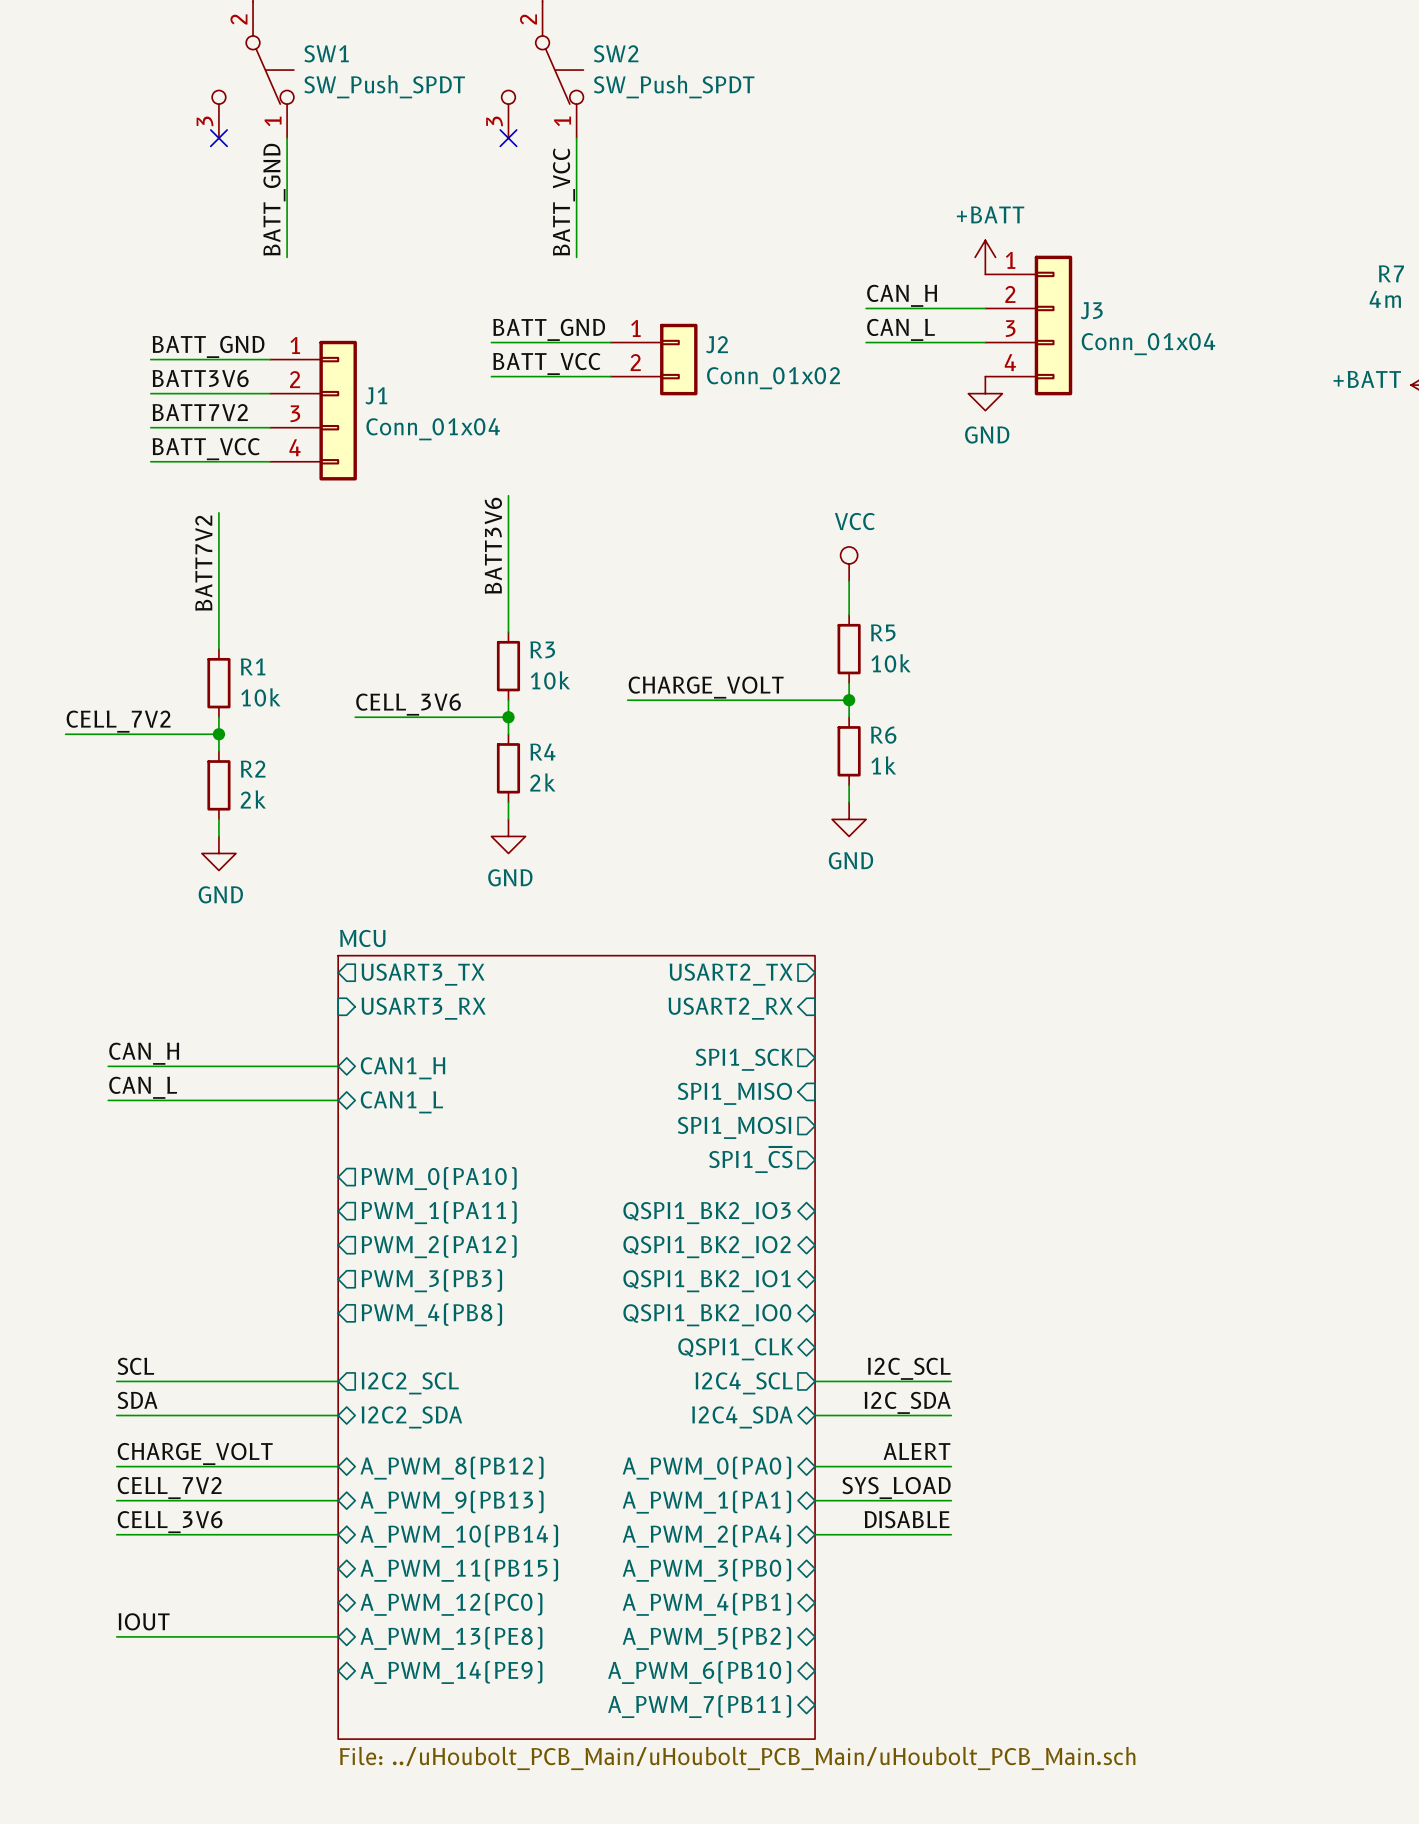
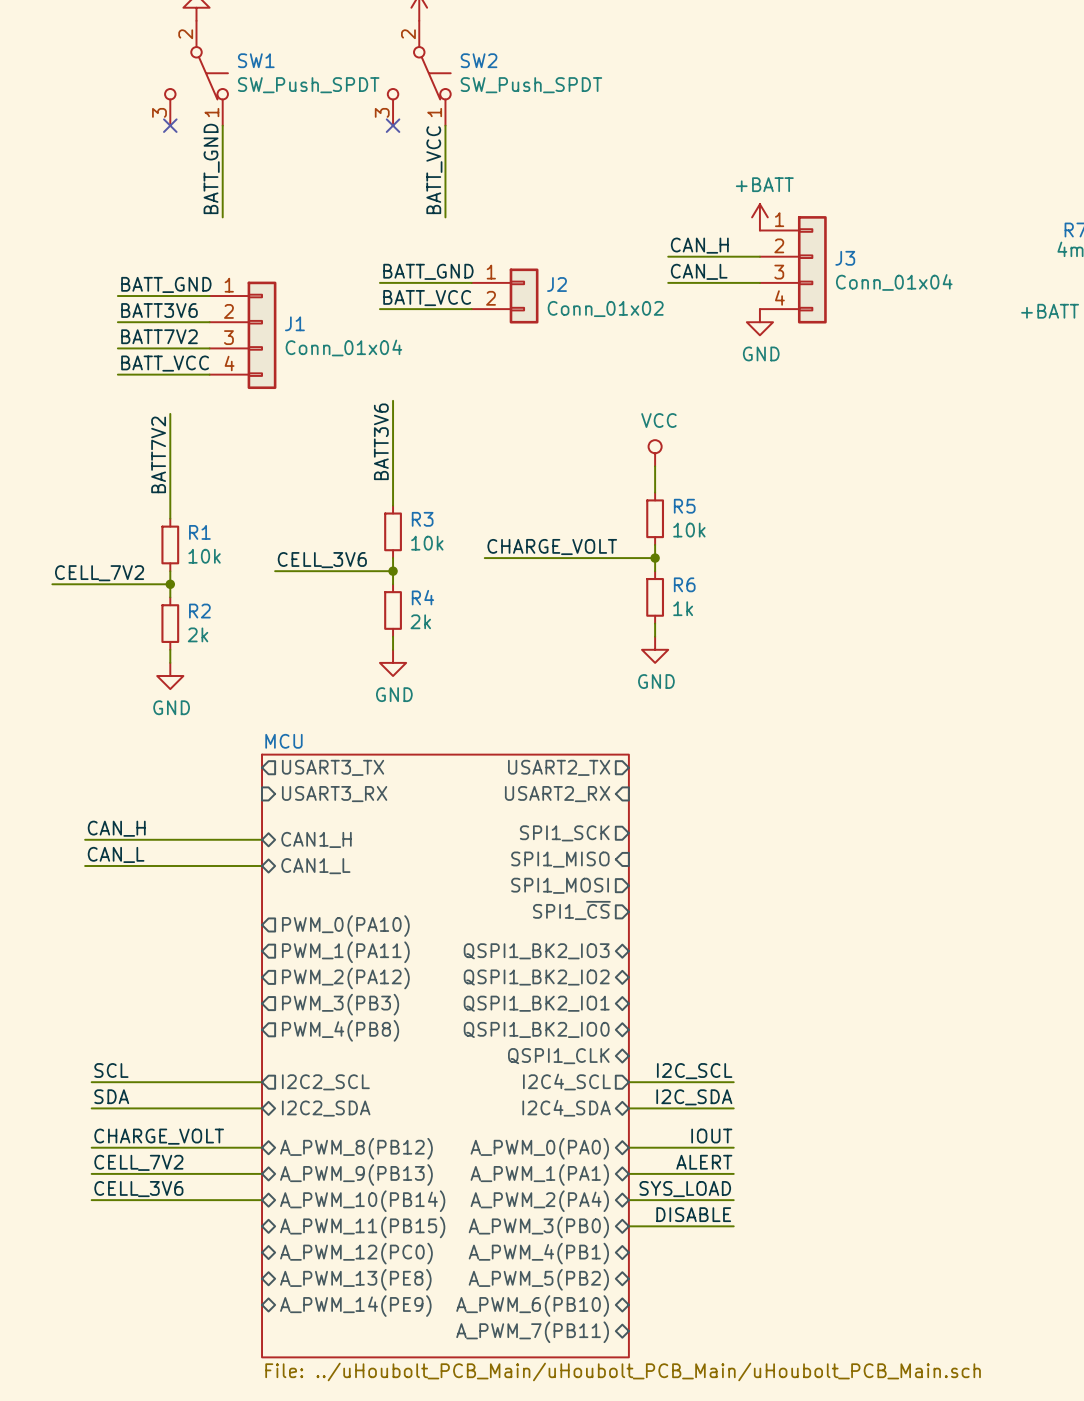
label: ALERT (916, 1451) -> IOUT (711, 1136)
label: SYS_LOAD (896, 1488) -> ALERT (704, 1162)
label: DISABLE (907, 1519) -> SYS_LOAD (685, 1189)
label: none -> DISABLE (693, 1214)
wire: none -> (628, 1226) (733, 1226)
label: IOUT (144, 1621) -> none
wire: (116, 1636) (338, 1636) -> none

